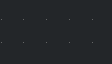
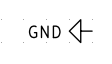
power symbol: none -> GND (80, 31)

